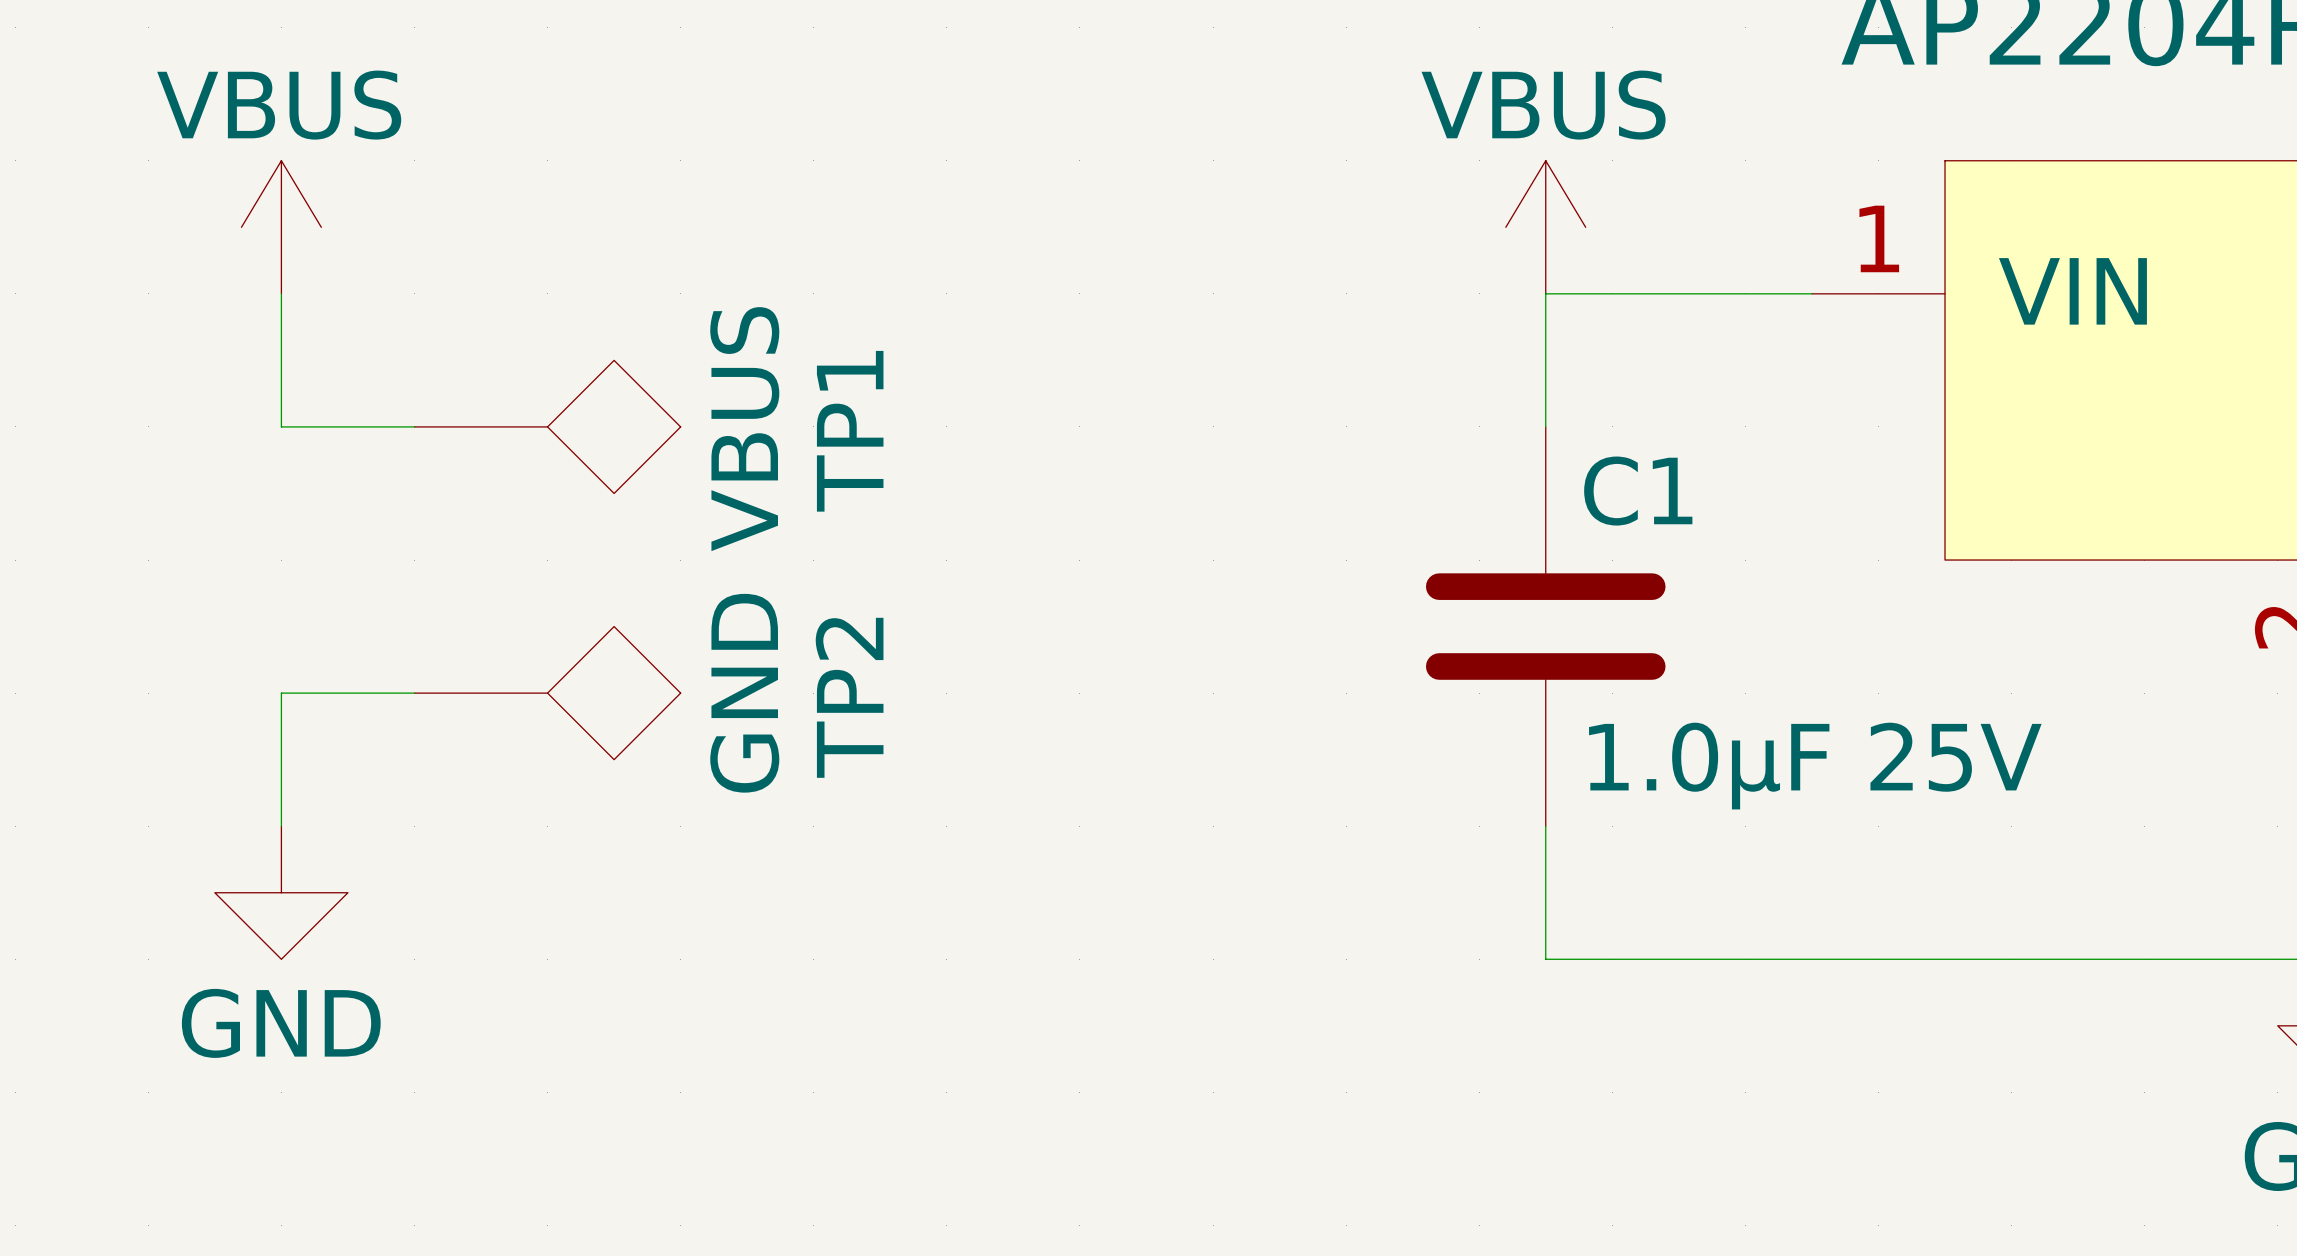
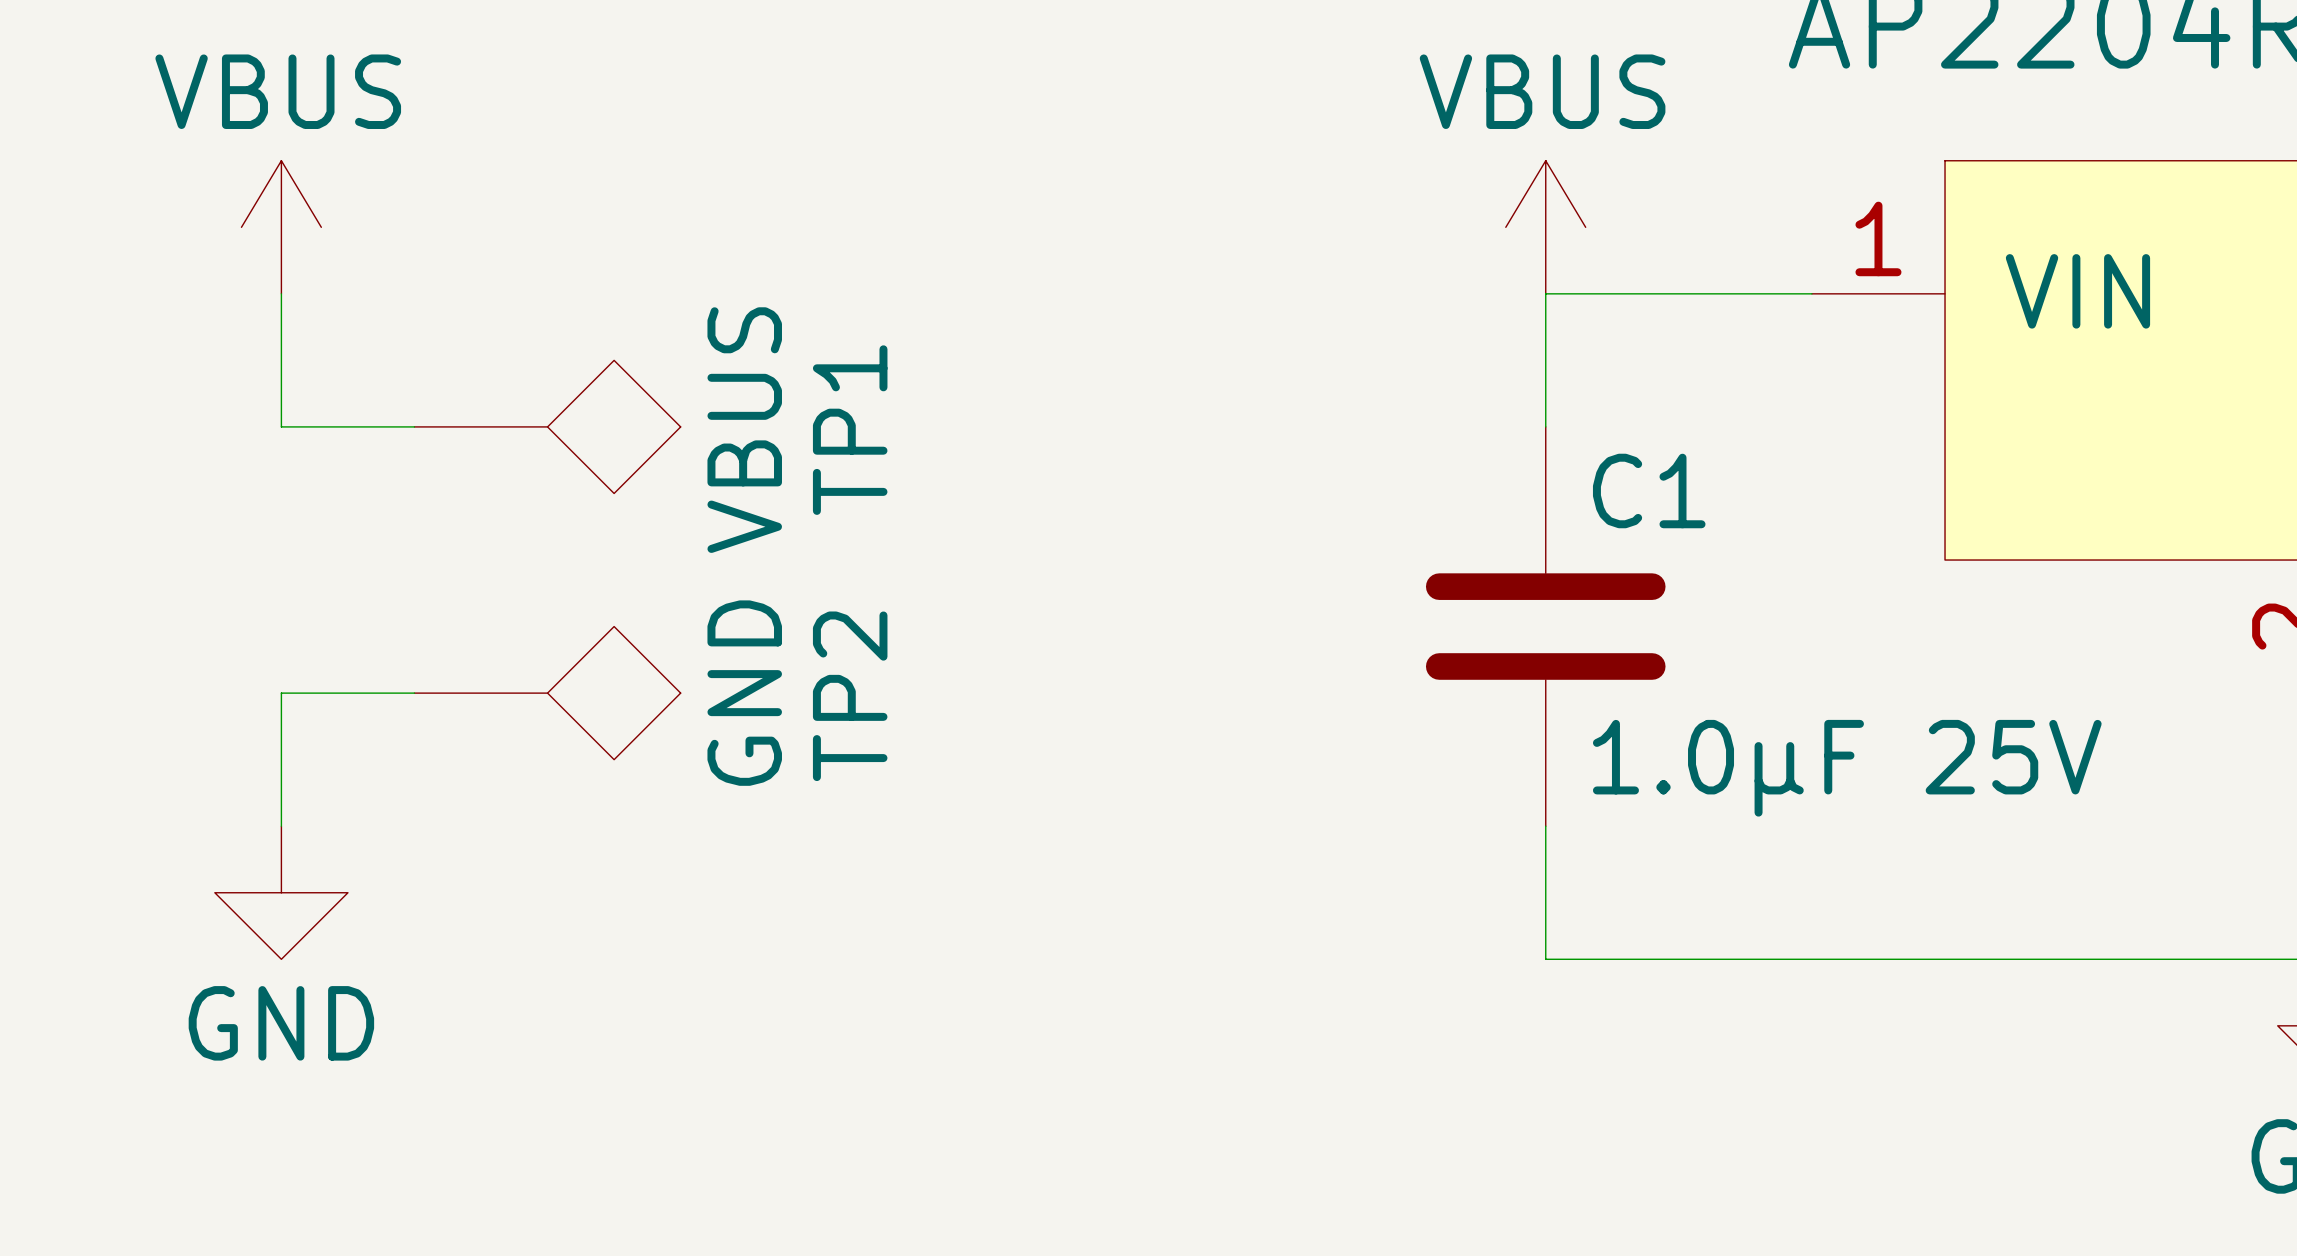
power symbol text position: VBUS (279, 105) -> VBUS (278, 91)
power symbol text position: VBUS (1543, 105) -> VBUS (1542, 91)

